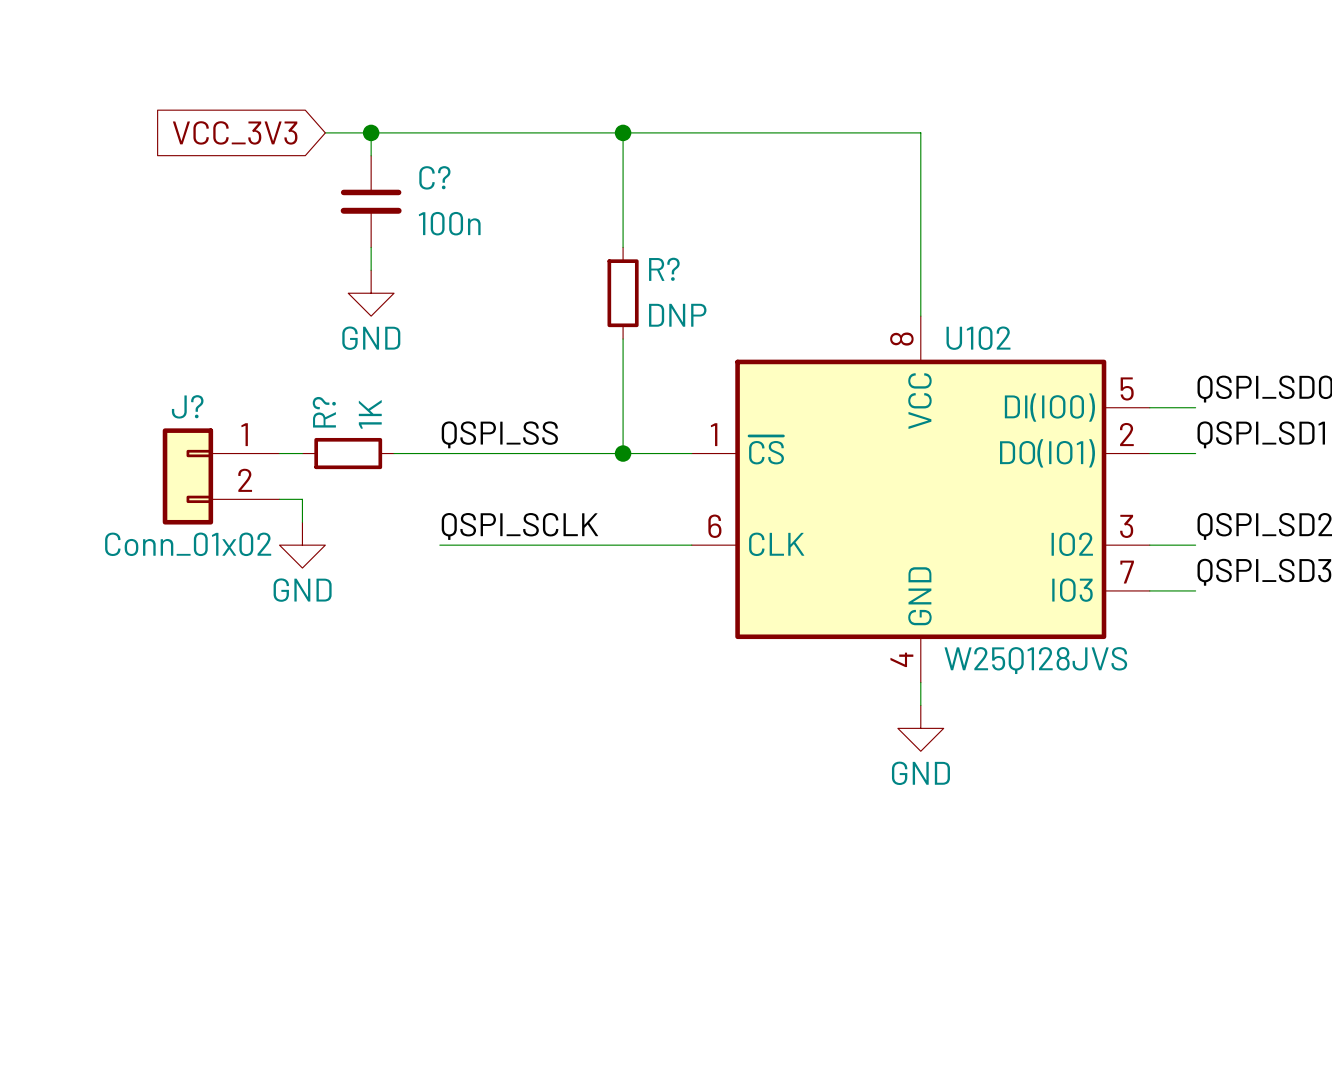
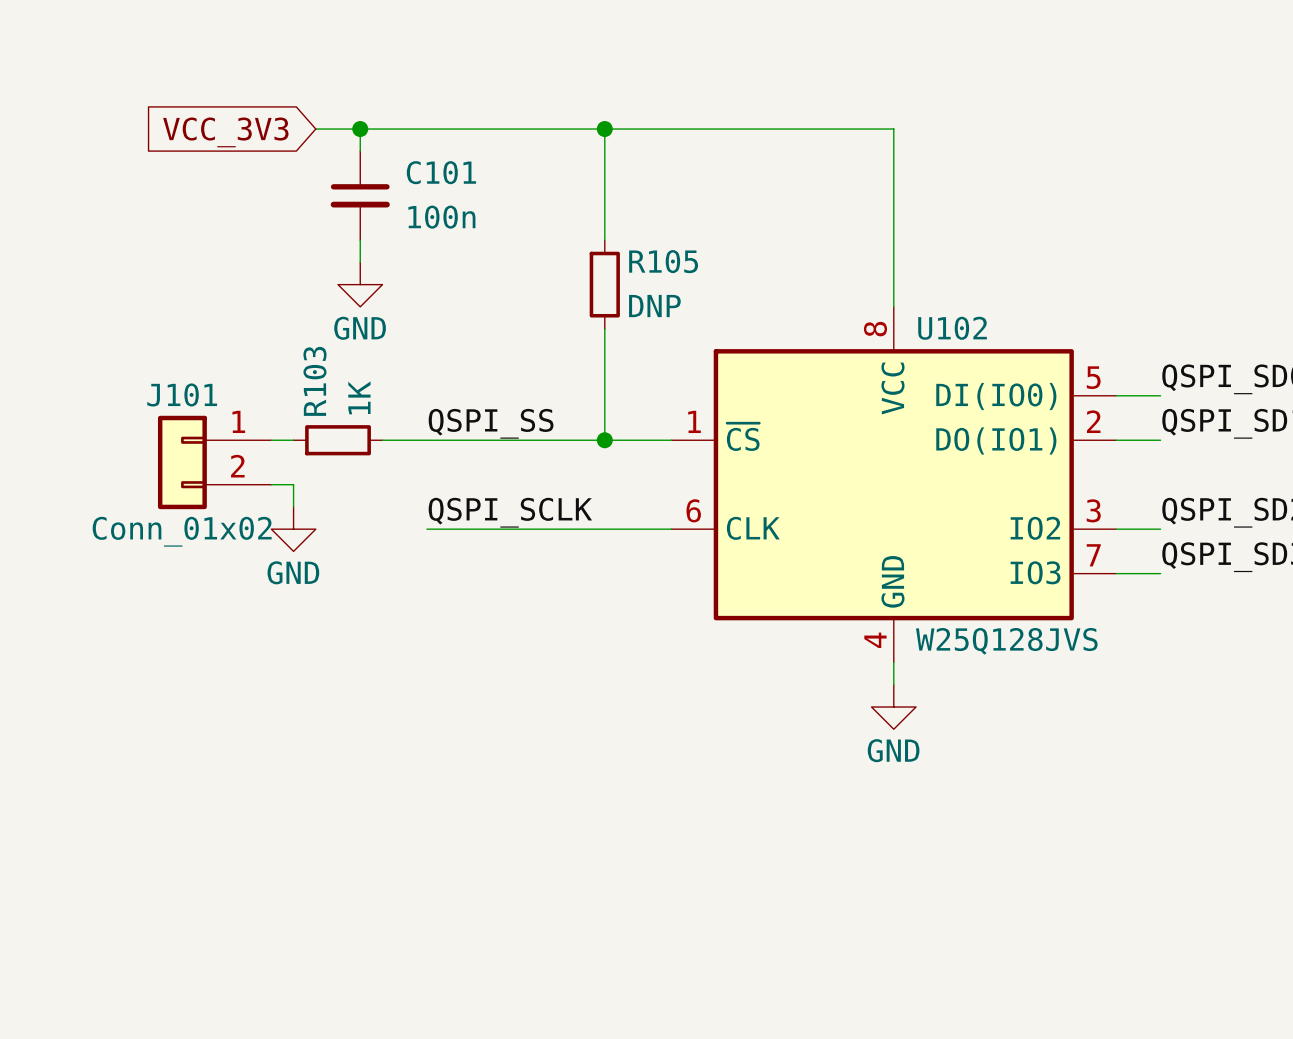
C? name: C? (434, 177) -> C101 (441, 172)
R? name: R? (664, 269) -> R105 (663, 261)
J? name: J? (187, 406) -> J101 (182, 394)
R? name: R? (324, 412) -> R103 (314, 381)

